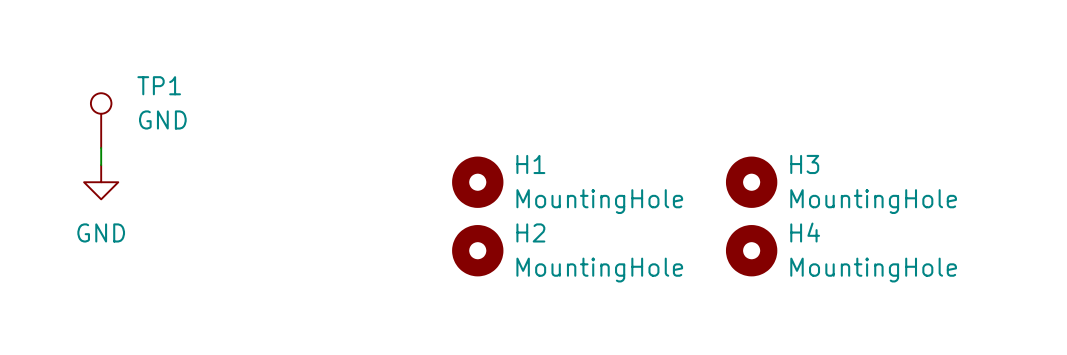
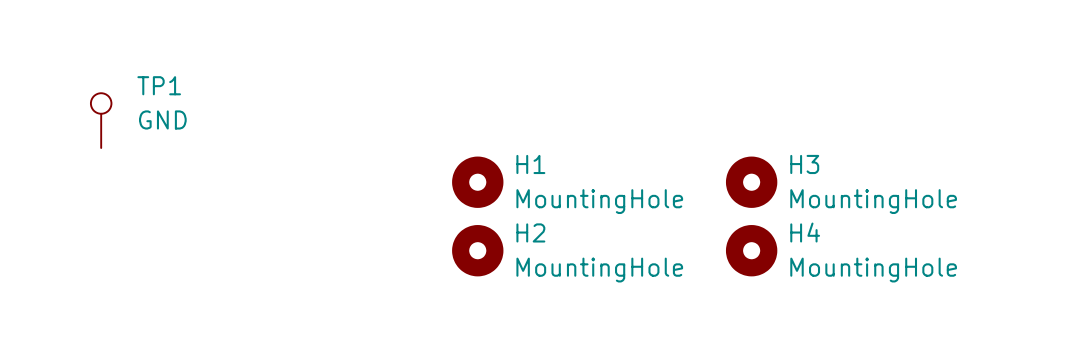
wire: (101, 148) (101, 165) -> none
power symbol: GND (101, 182) -> none

